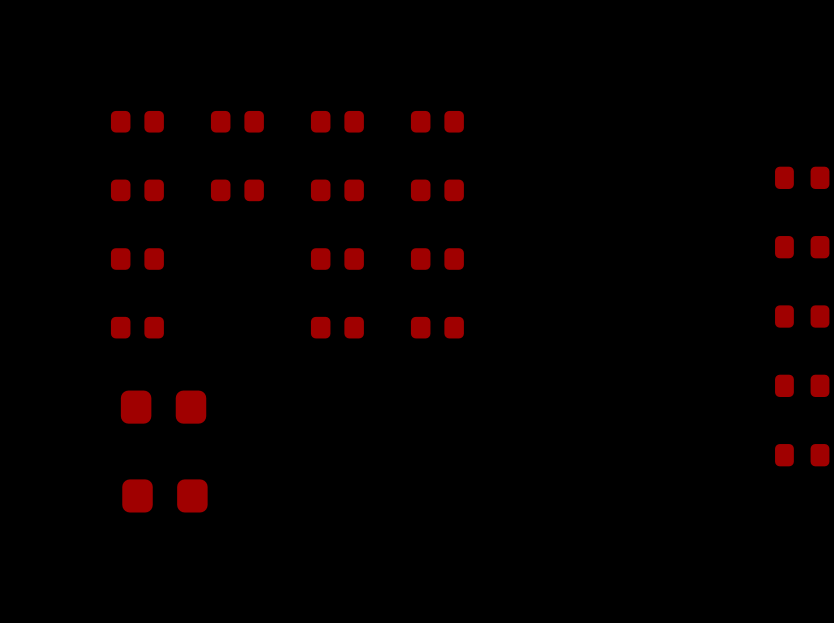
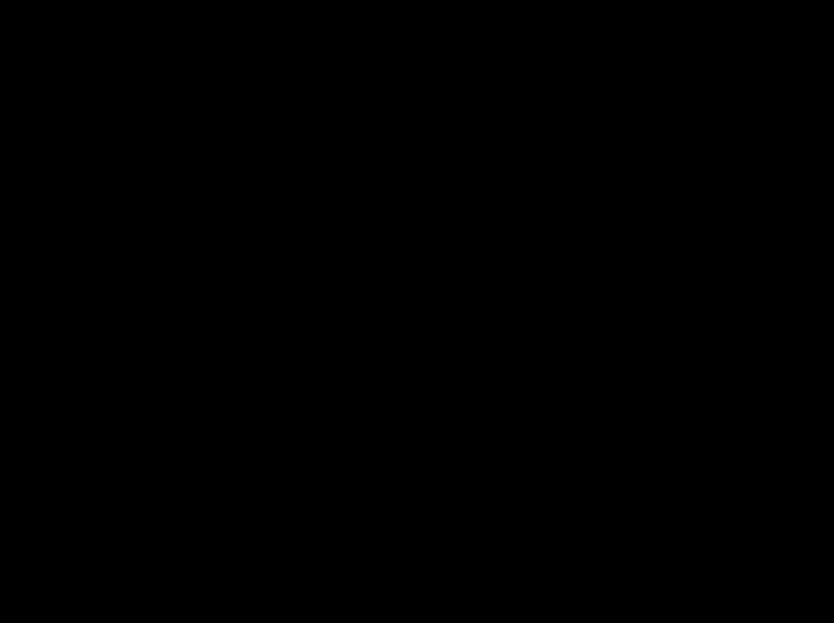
part: (137, 121) -> none
part: (237, 121) -> none
part: (337, 121) -> none
part: (437, 121) -> none
part: (802, 177) -> none
part: (137, 190) -> none
part: (237, 190) -> none
part: (337, 190) -> none
part: (437, 190) -> none
part: (802, 247) -> none
part: (137, 259) -> none
part: (337, 259) -> none
part: (437, 259) -> none
part: (802, 316) -> none
part: (137, 327) -> none
part: (337, 327) -> none
part: (437, 327) -> none
part: (802, 385) -> none
part: (163, 407) -> none
part: (802, 455) -> none
part: (164, 495) -> none

